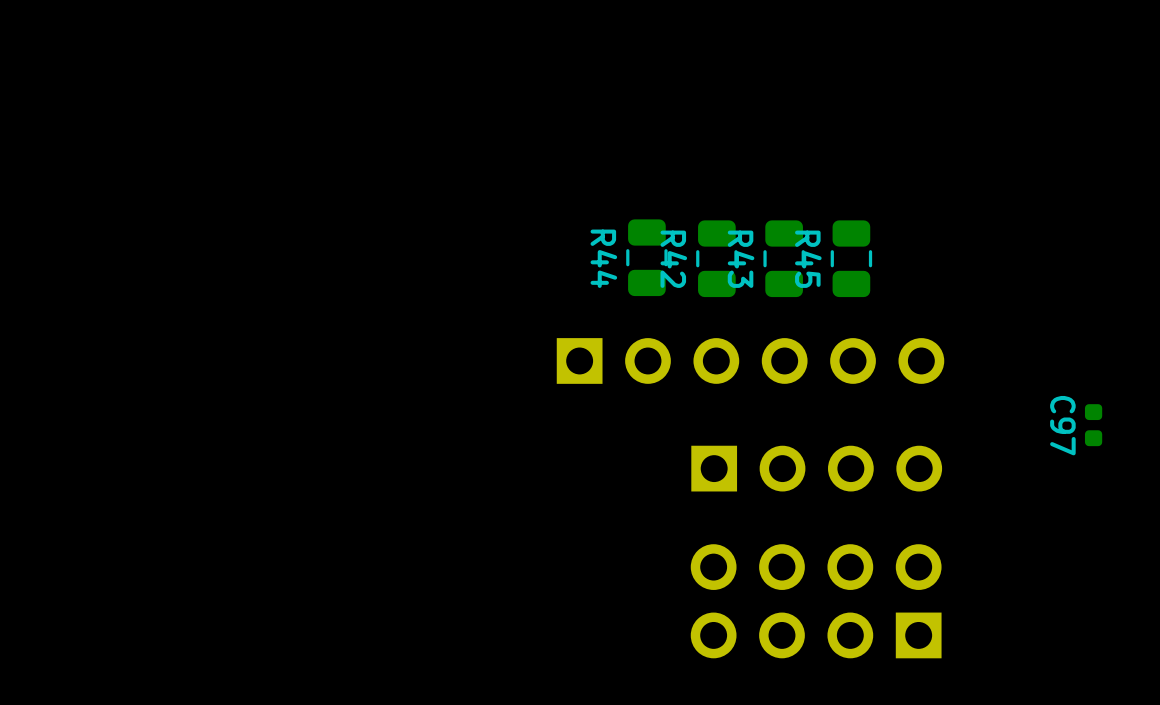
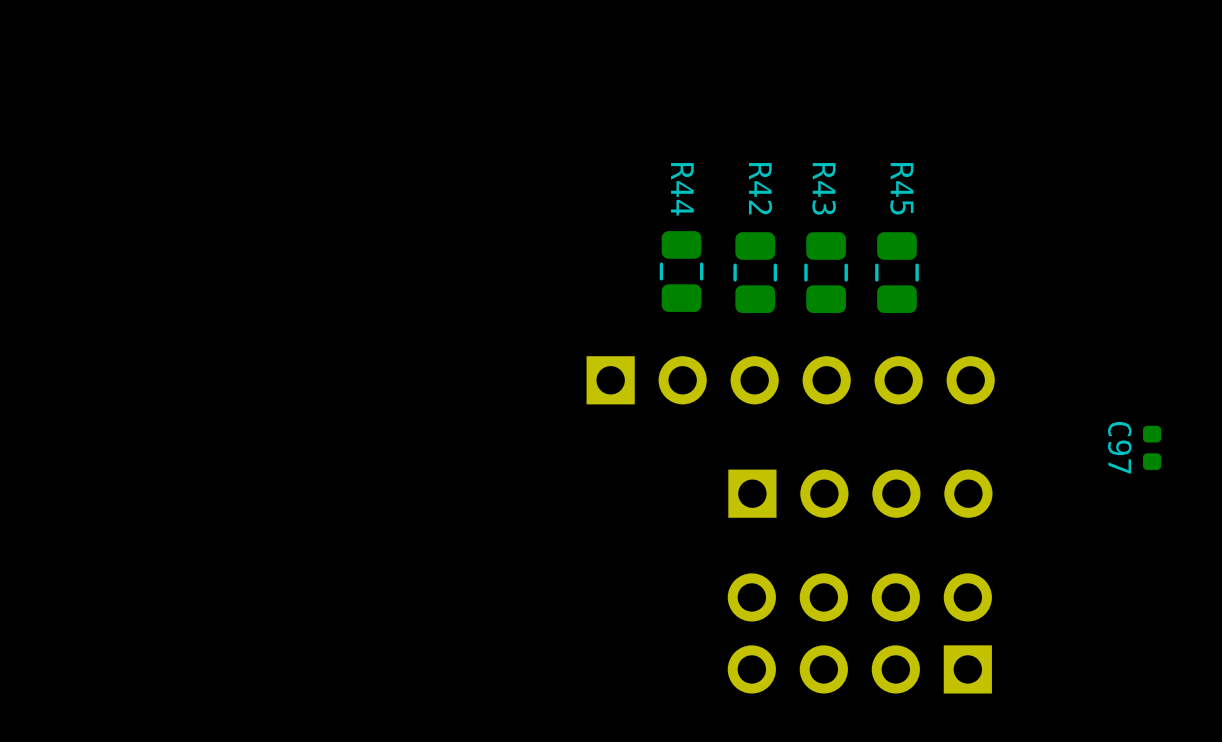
R44 name position: R44 (603, 258) -> R44 (682, 189)
R42 name position: R42 (673, 259) -> R42 (760, 188)
R43 name position: R43 (741, 259) -> R43 (824, 188)
R45 name position: R45 (808, 259) -> R45 (901, 188)

